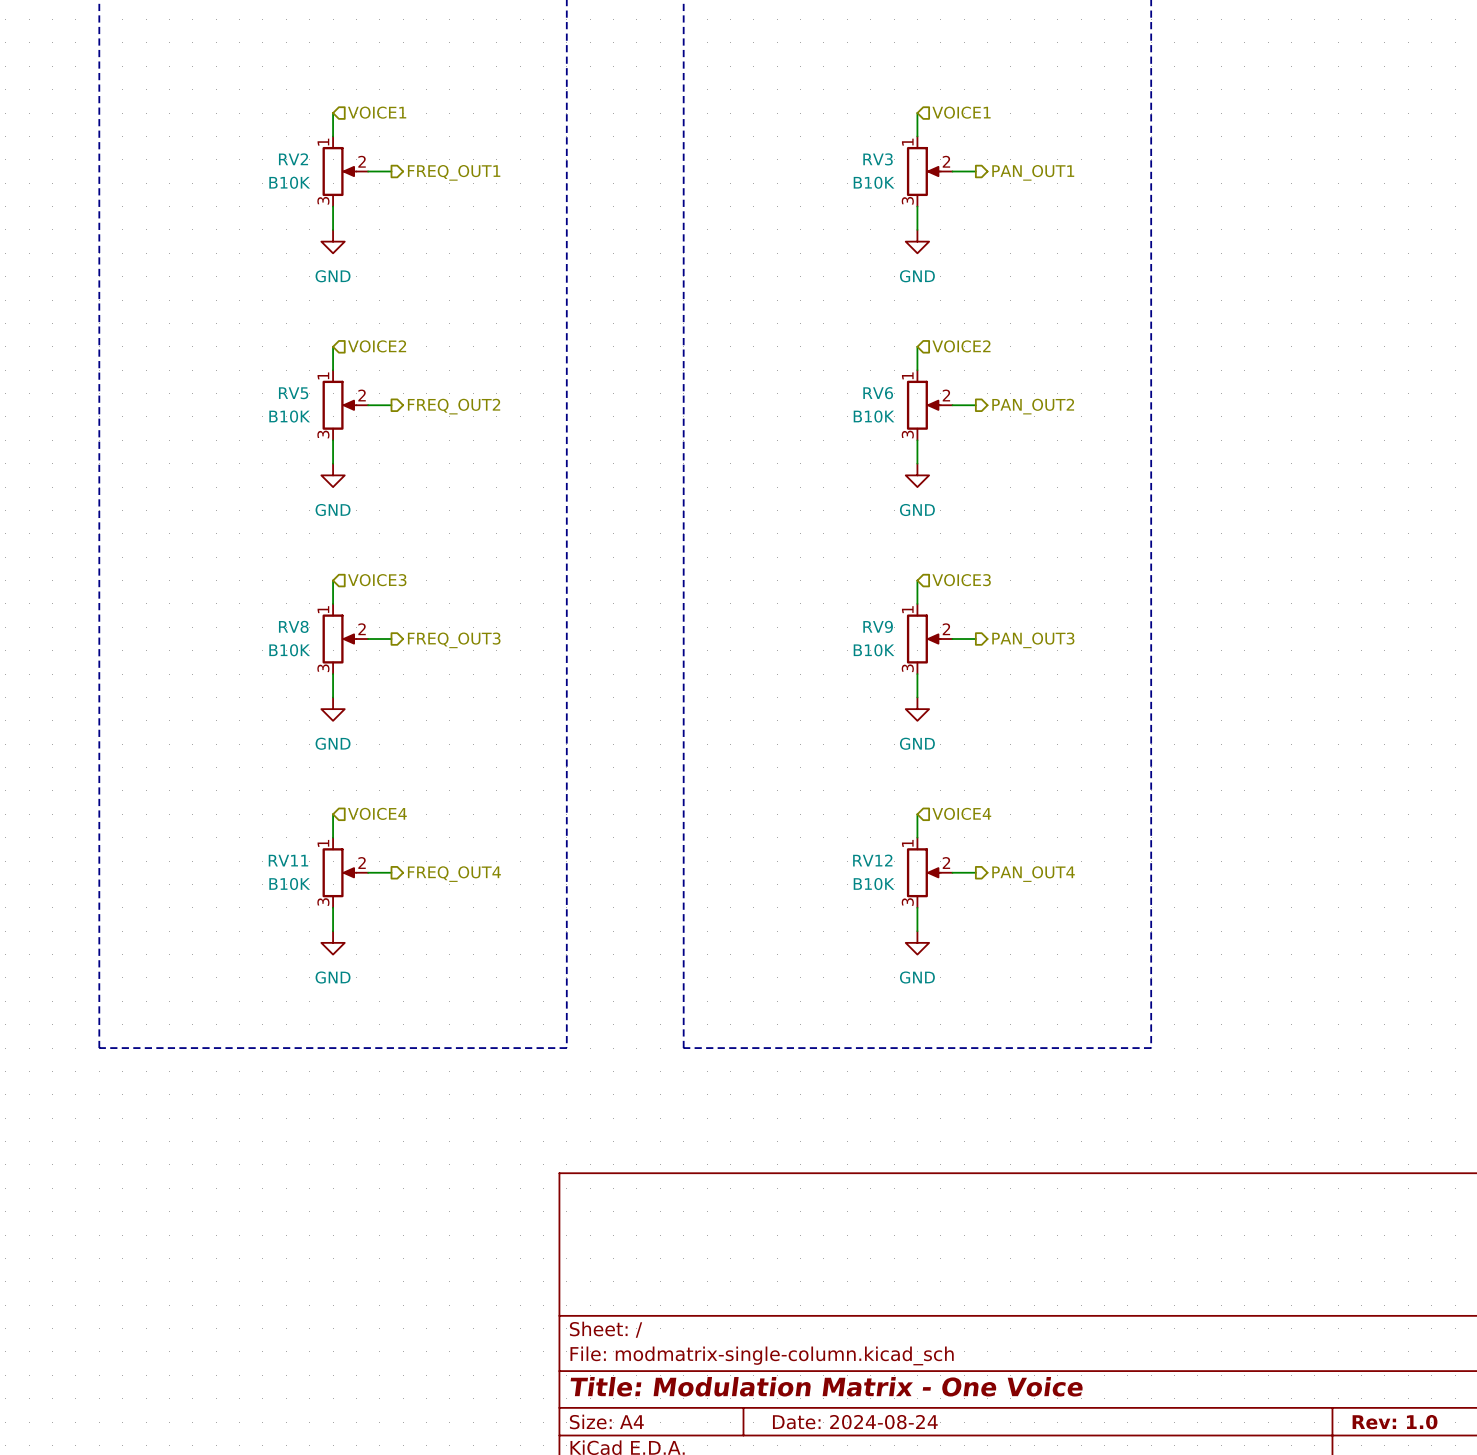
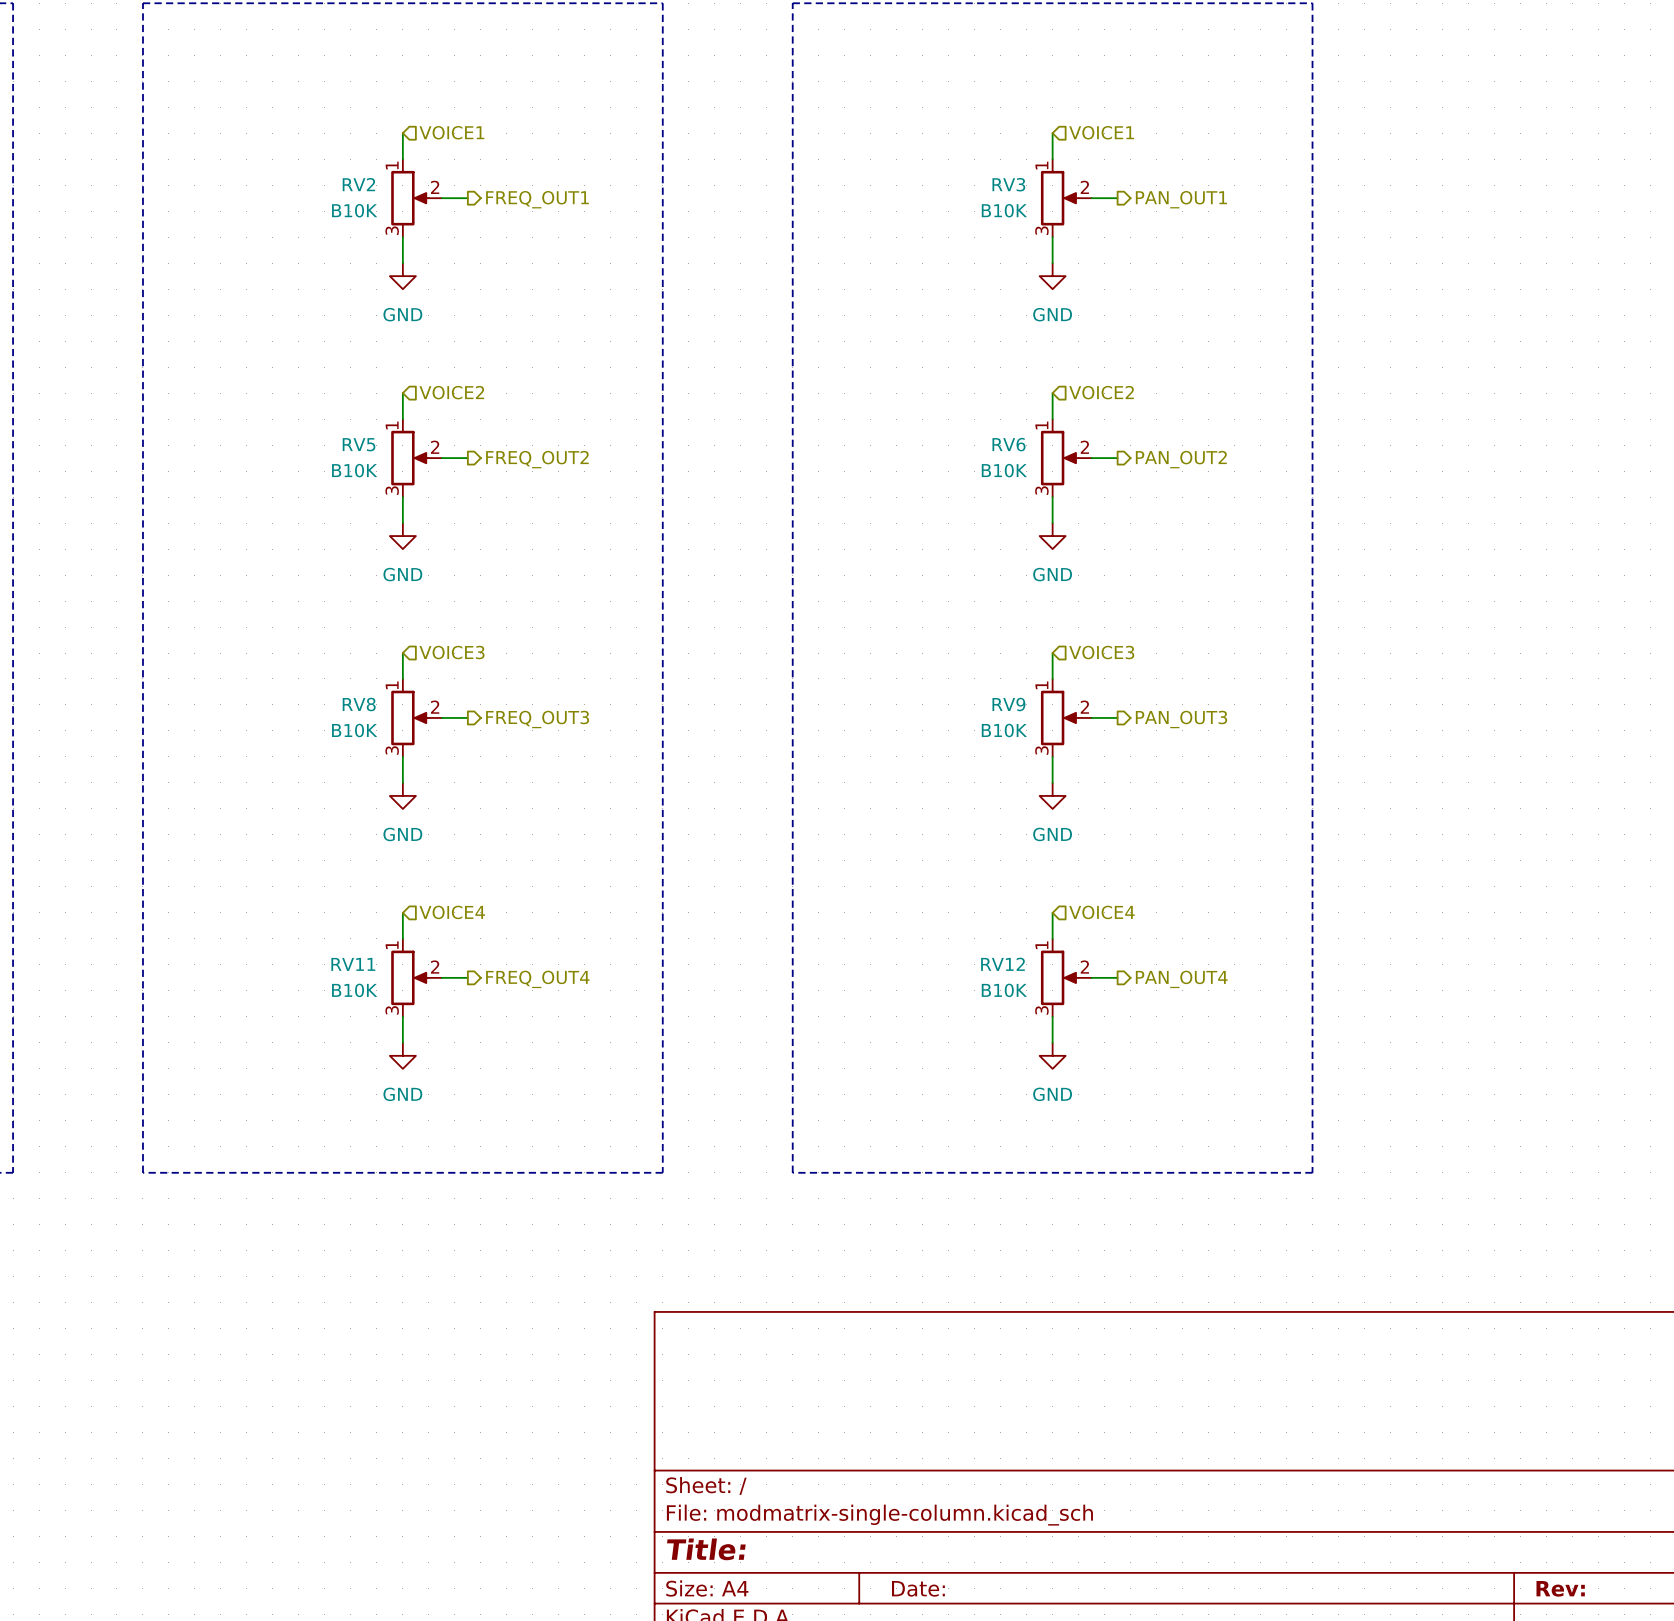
title block: Title: Modulation Matrix - One Voice (826, 1386) -> Title: (706, 1549)
title block: Date: 2024-08-24 (855, 1422) -> Date: (918, 1588)
title block: Rev: 1.0 (1395, 1422) -> Rev: (1560, 1588)

